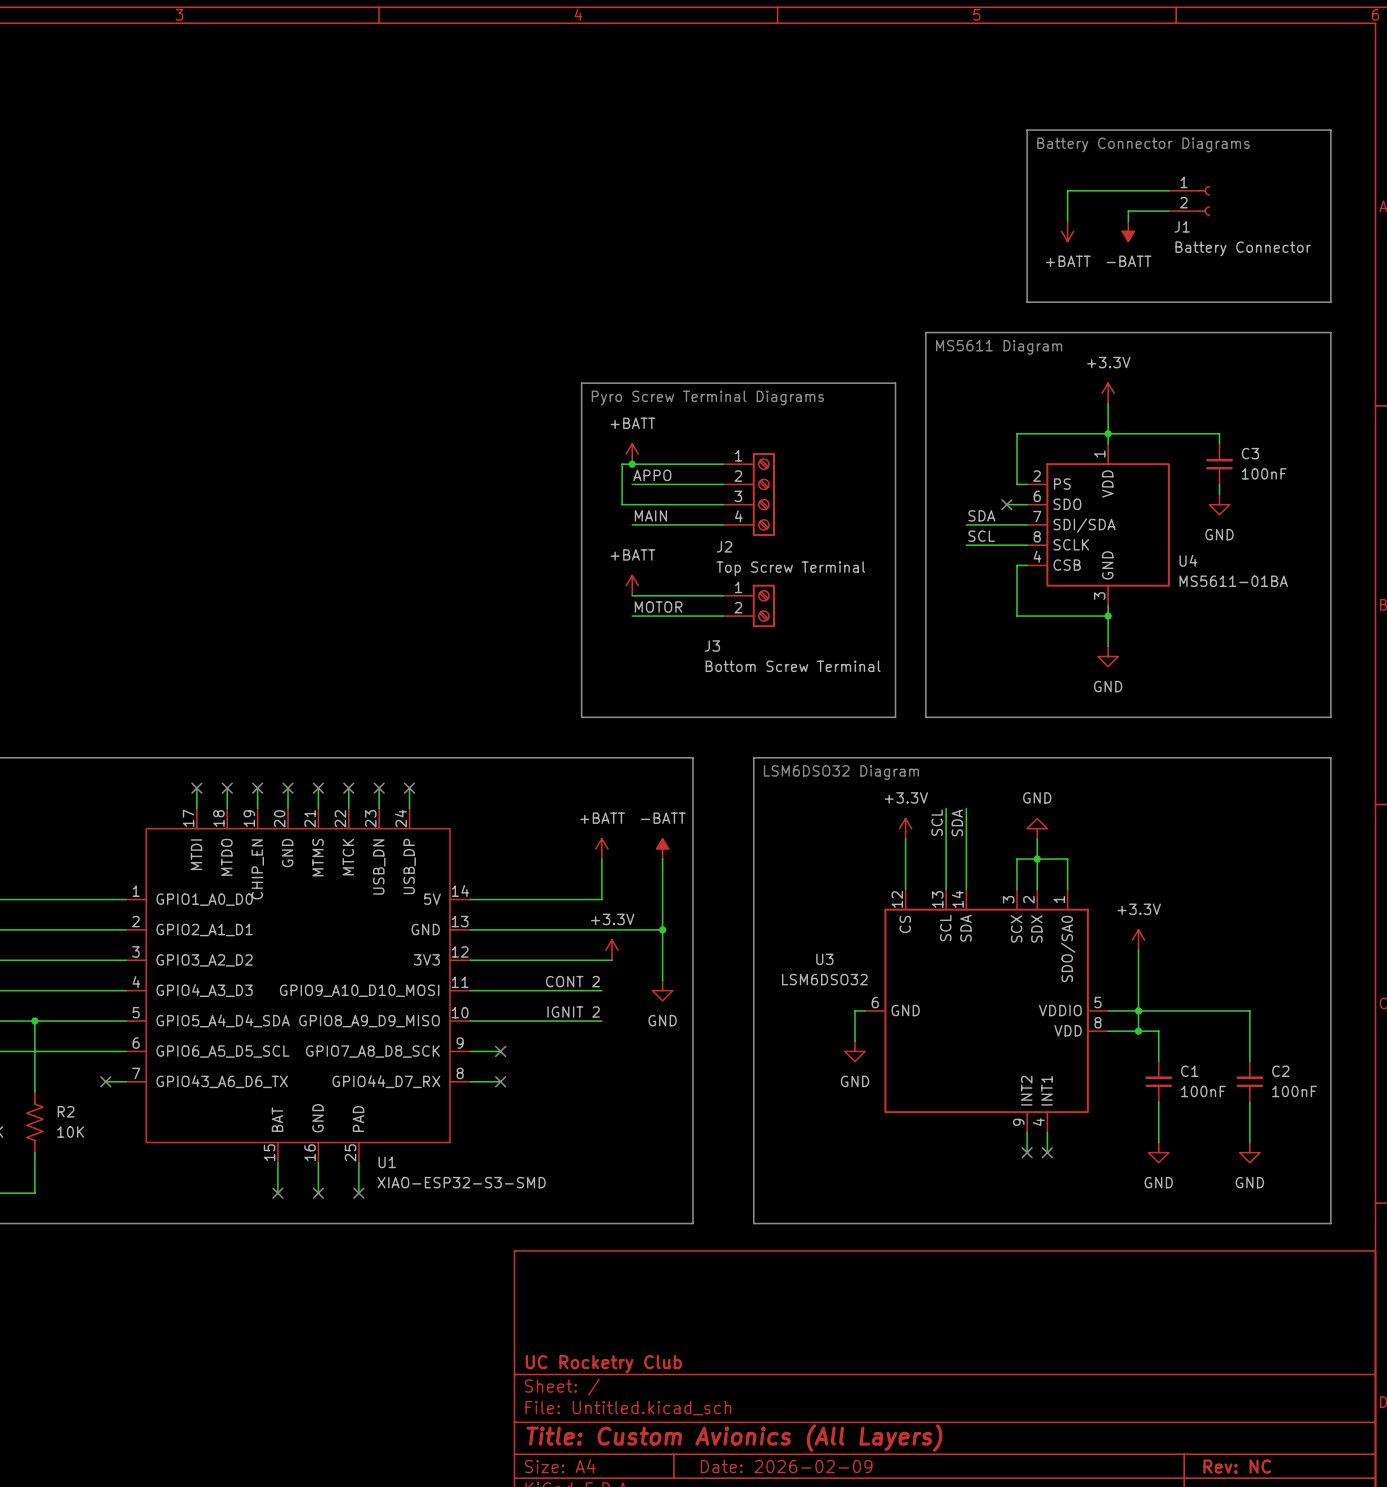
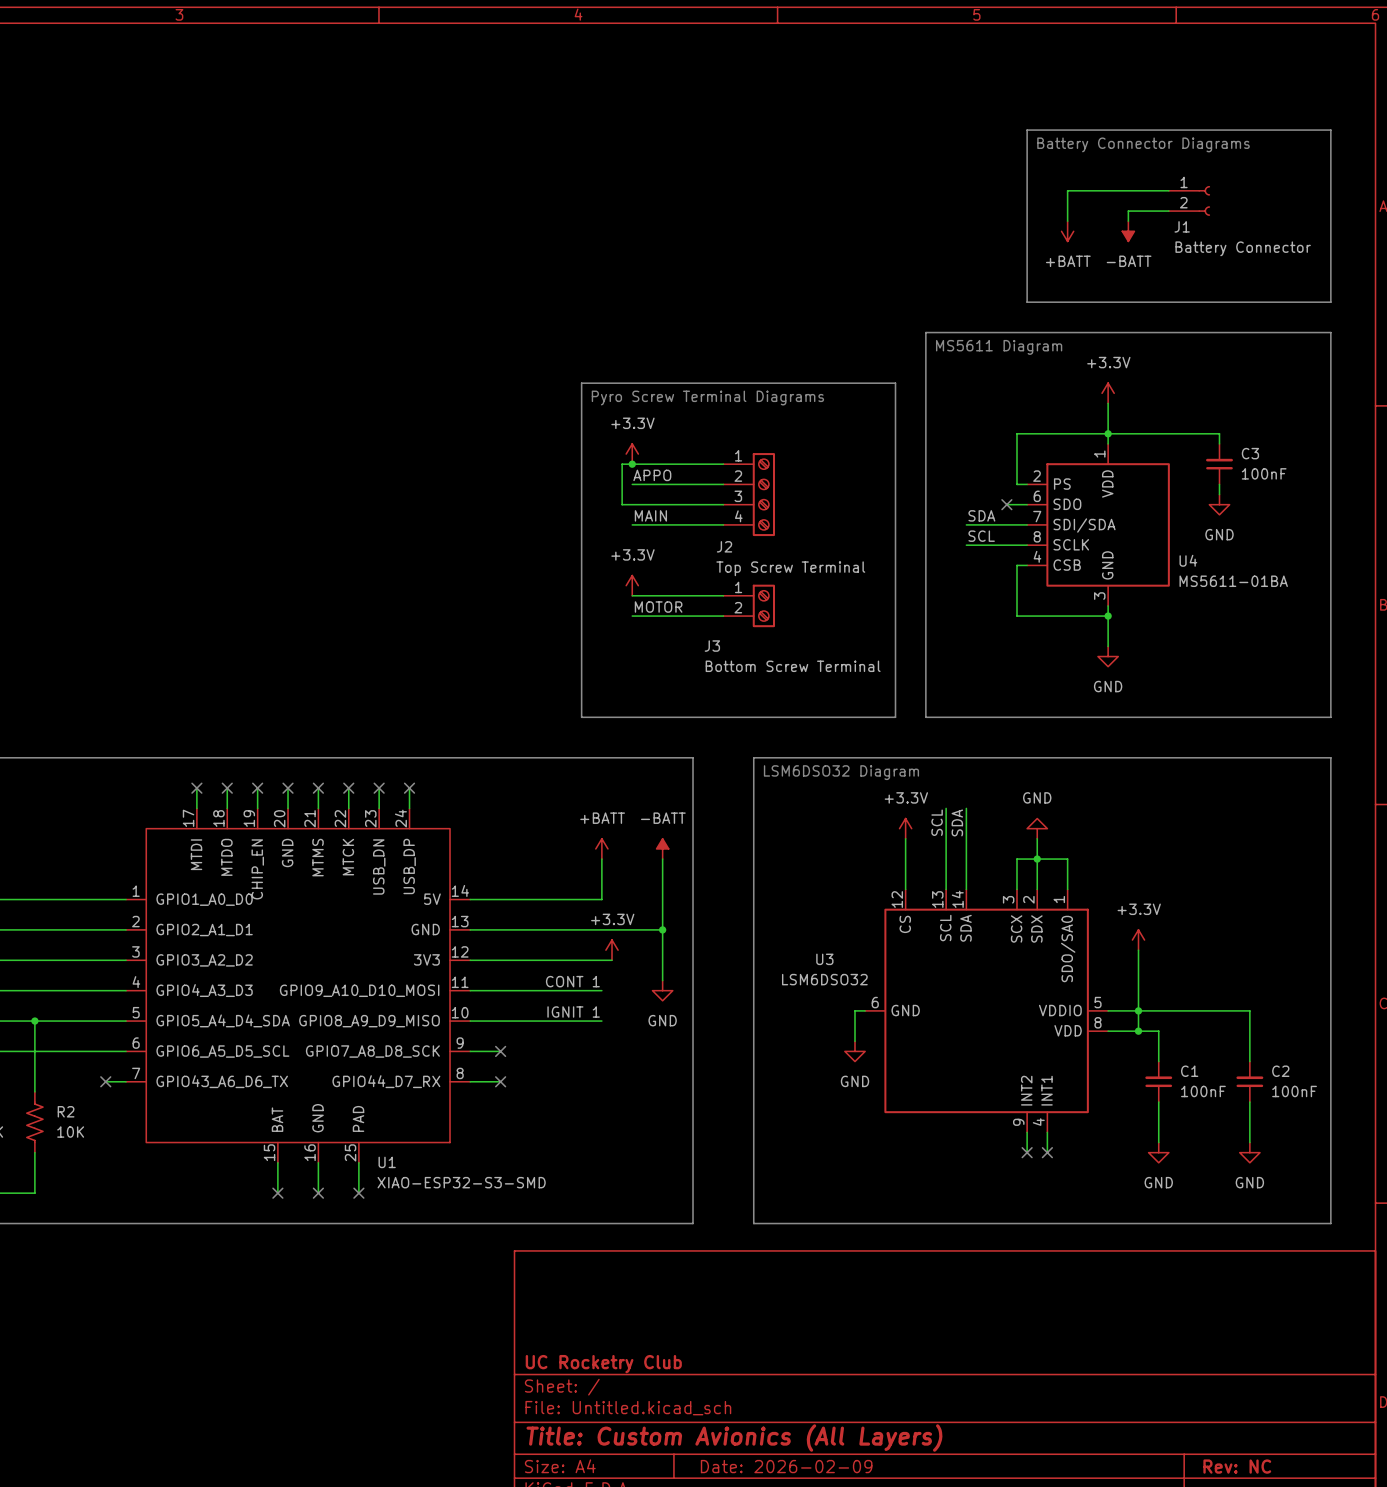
power symbol: +BATT (632, 454) -> +3.3V (632, 454)
power symbol: +BATT (632, 585) -> +3.3V (632, 585)
label: CONT 2 (572, 981) -> CONT 1 (572, 981)
label: IGNIT 2 (573, 1012) -> IGNIT 1 (573, 1012)

